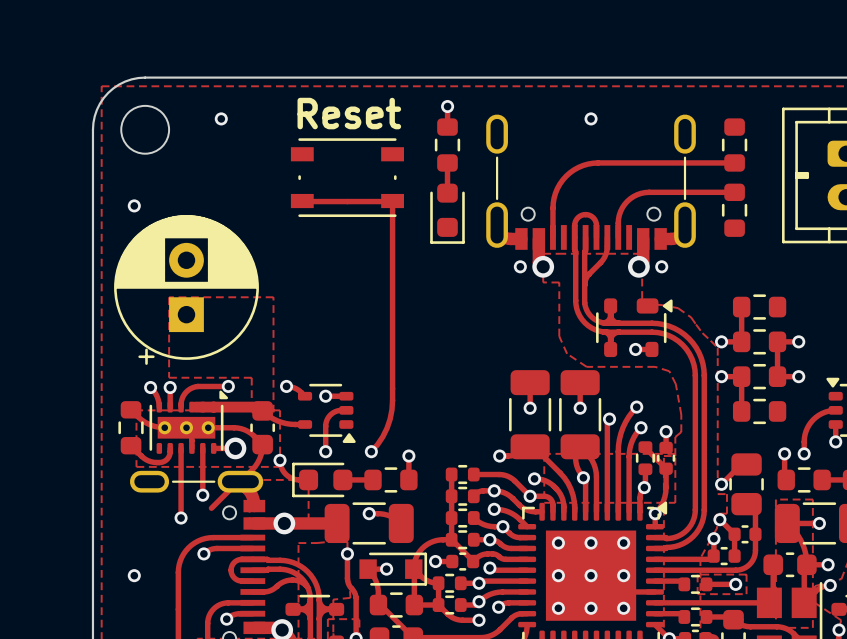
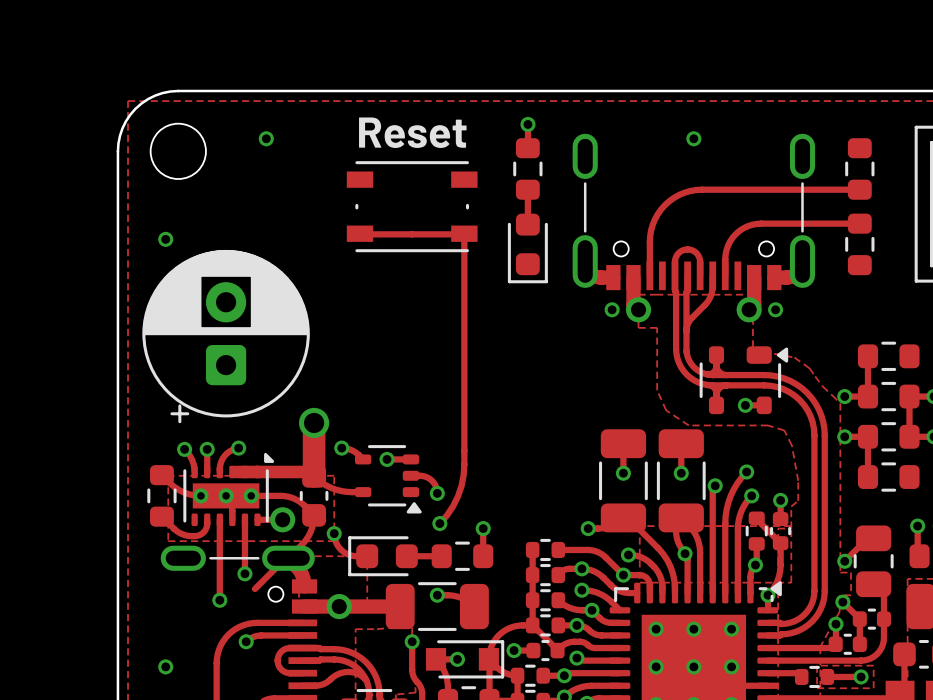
part footprint: [114, 215, 259, 365] -> [142, 249, 310, 424]
zone outline: (169, 297) (169, 377) (251, 377) (251, 412) (273, 412) (273, 297) (169, 297) -> none
track: none -> (314, 422) (314, 476)
via: none -> (314, 422)
track: (228, 386) (193, 387) (184, 394) (181, 404) -> (238, 448) (230, 451) (224, 455) (219, 469)
via position: (228, 386) -> (238, 448)
track: (346, 410) (335, 411) (327, 418) (325, 426) (325, 451) -> (410, 475) (429, 478) (434, 484) (437, 493)
via position: (325, 451) -> (437, 493)

